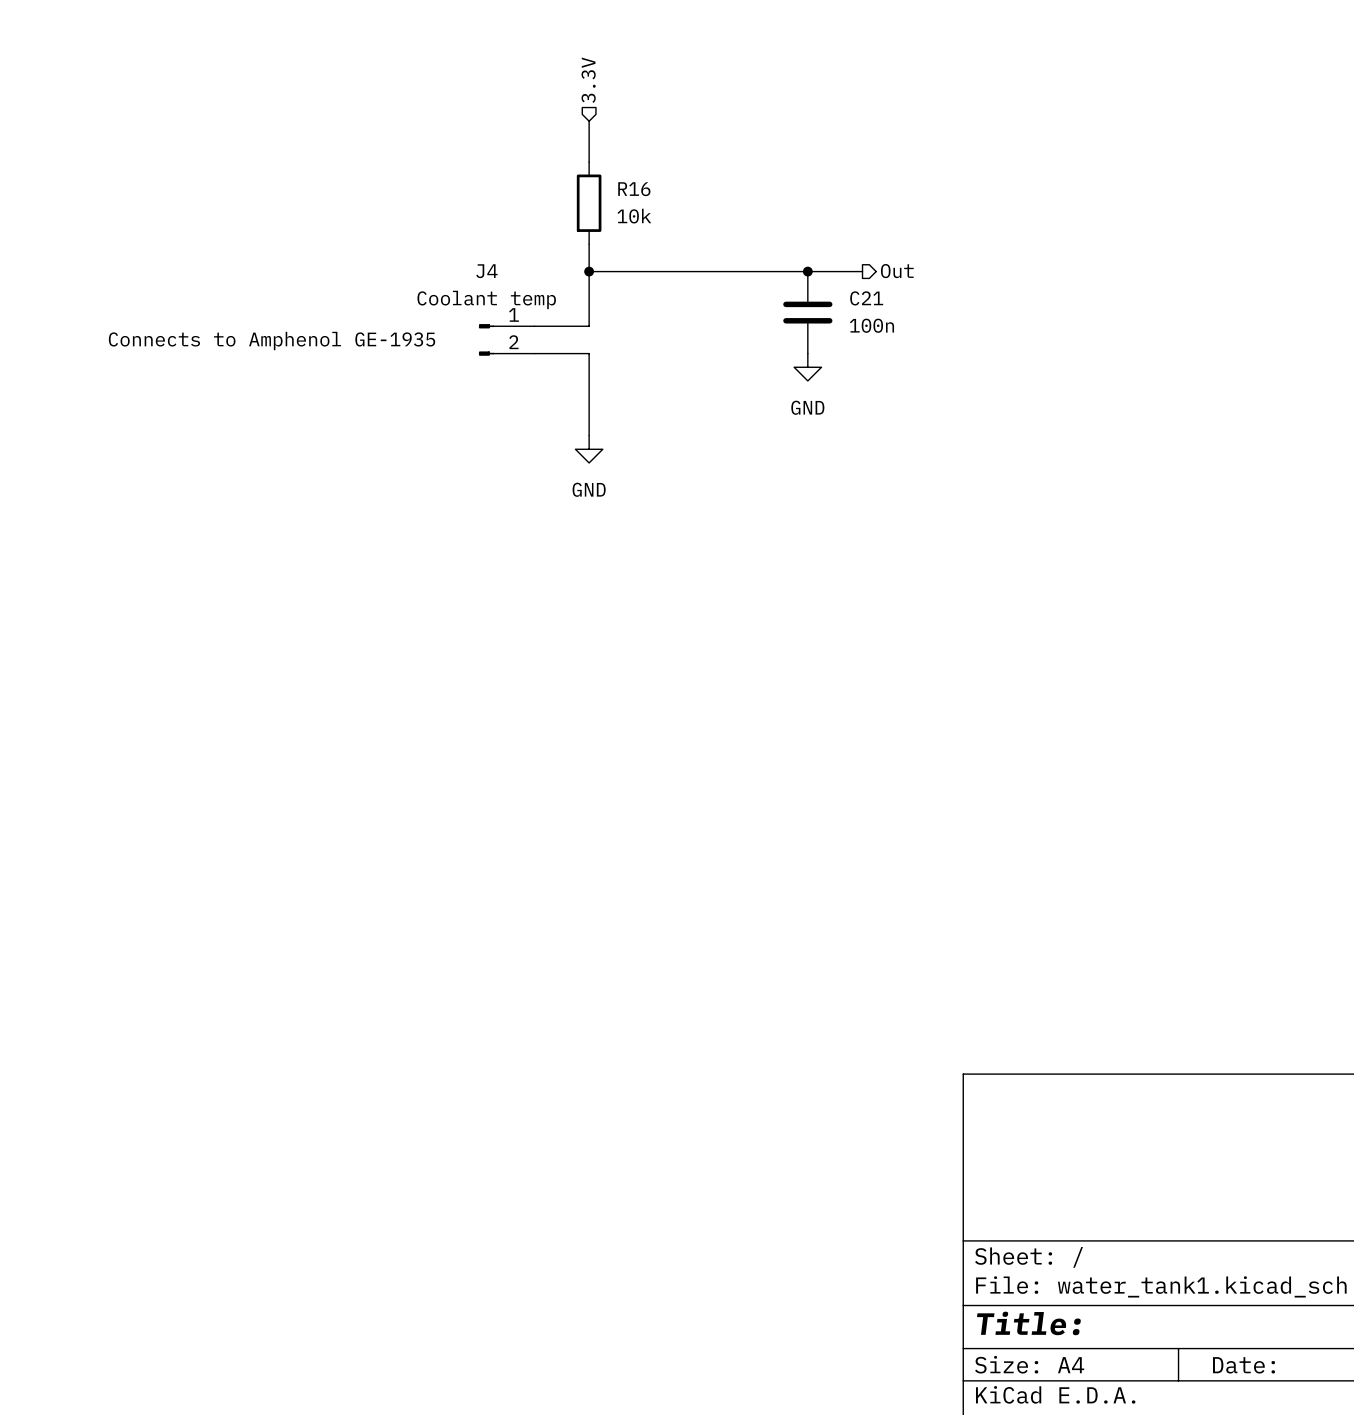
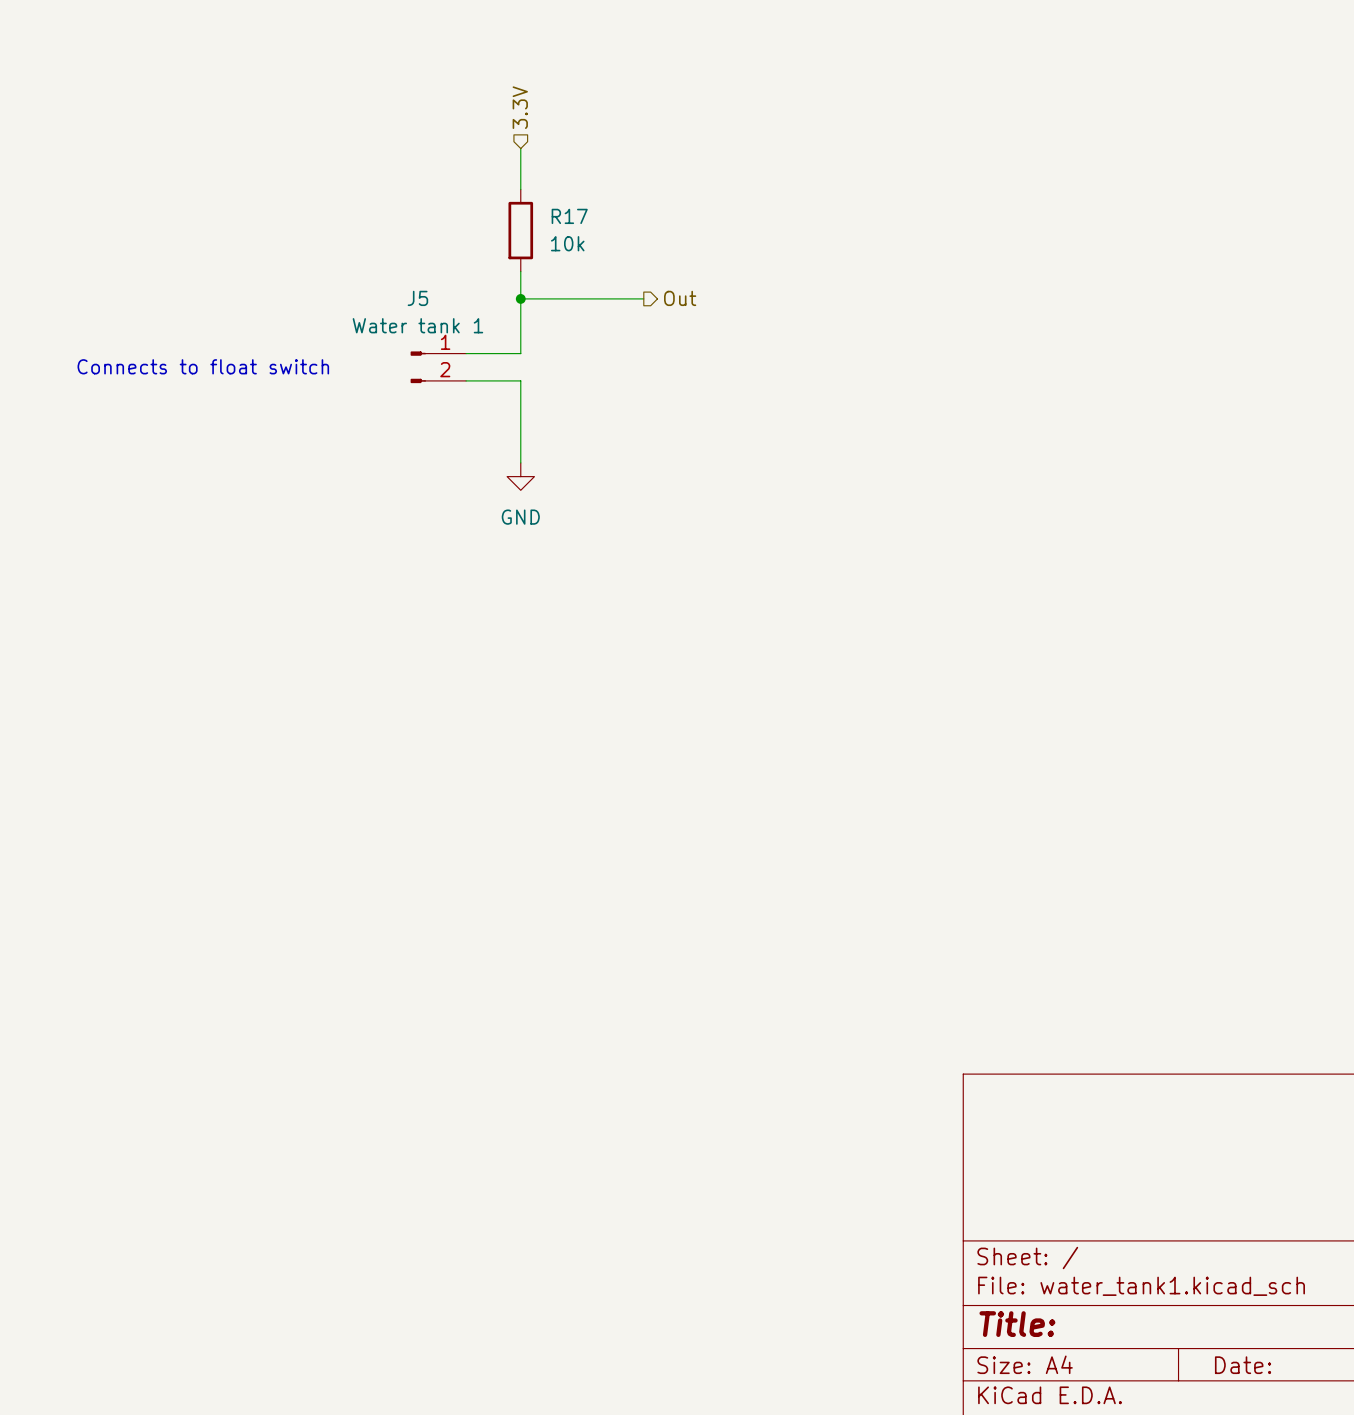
hierarchical label position: 3.3V (588, 80) -> 3.3V (520, 107)
wire: (589, 121) (589, 162) -> (520, 148) (520, 189)
R16: 10k (589, 203) -> none
R17: none -> 10k (520, 230)
wire: (589, 244) (589, 326) (534, 326) -> (520, 271) (520, 353) (466, 353)
wire: (589, 271) (862, 271) -> none
junction: (589, 271) -> none
junction: (807, 271) -> none
hierarchical label position: Out (897, 271) -> Out (680, 298)
wire: none -> (520, 298) (643, 298)
junction: none -> (520, 298)
C21: 100n (807, 312) -> none
J4: Coolant temp (506, 339) -> none
text: Connects to Amphenol GE-1935 (272, 341) -> none
wire: (534, 353) (589, 353) (589, 435) -> (466, 380) (520, 380) (520, 462)
text: none -> Connects to float switch (203, 366)
J5: none -> Water tank 1 (438, 367)
power symbol: GND (807, 367) -> none
power symbol position: GND (589, 449) -> GND (520, 476)

